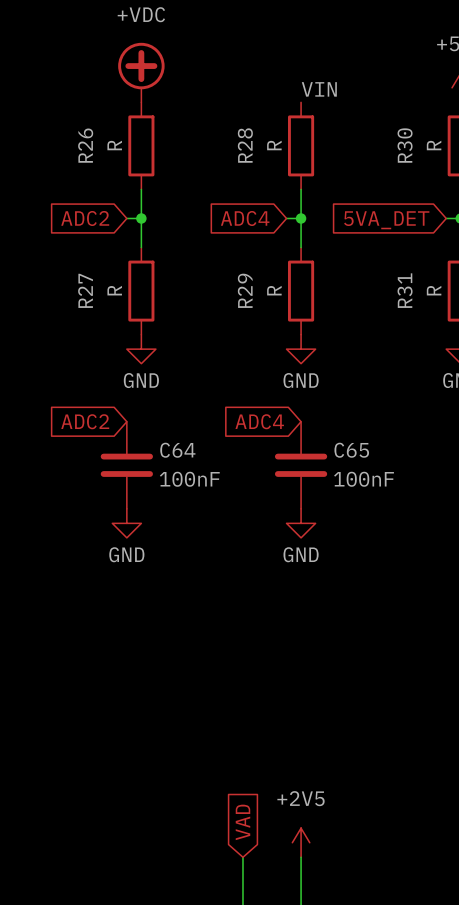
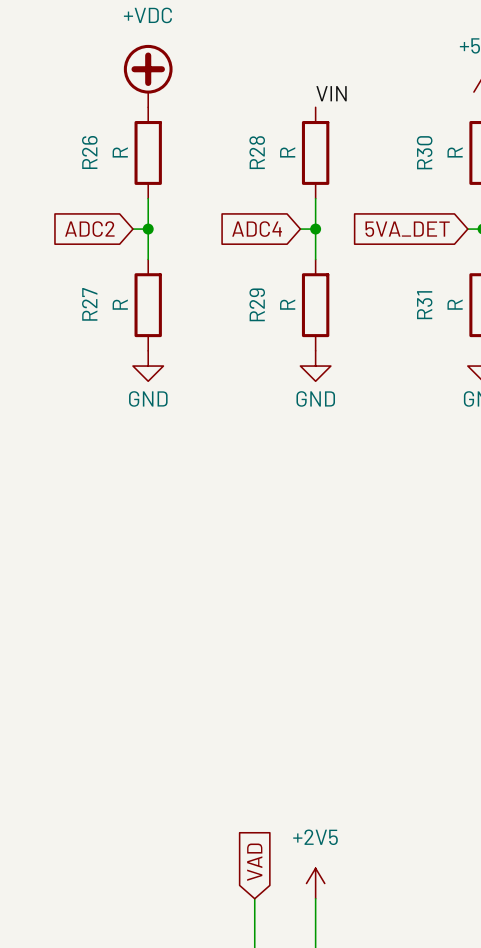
global label: ADC2 (85, 421) -> none
global label: ADC4 (259, 421) -> none
C64: 100nF (126, 465) -> none
C65: 100nF (301, 465) -> none
power symbol: GND (126, 523) -> none
power symbol: GND (301, 523) -> none

